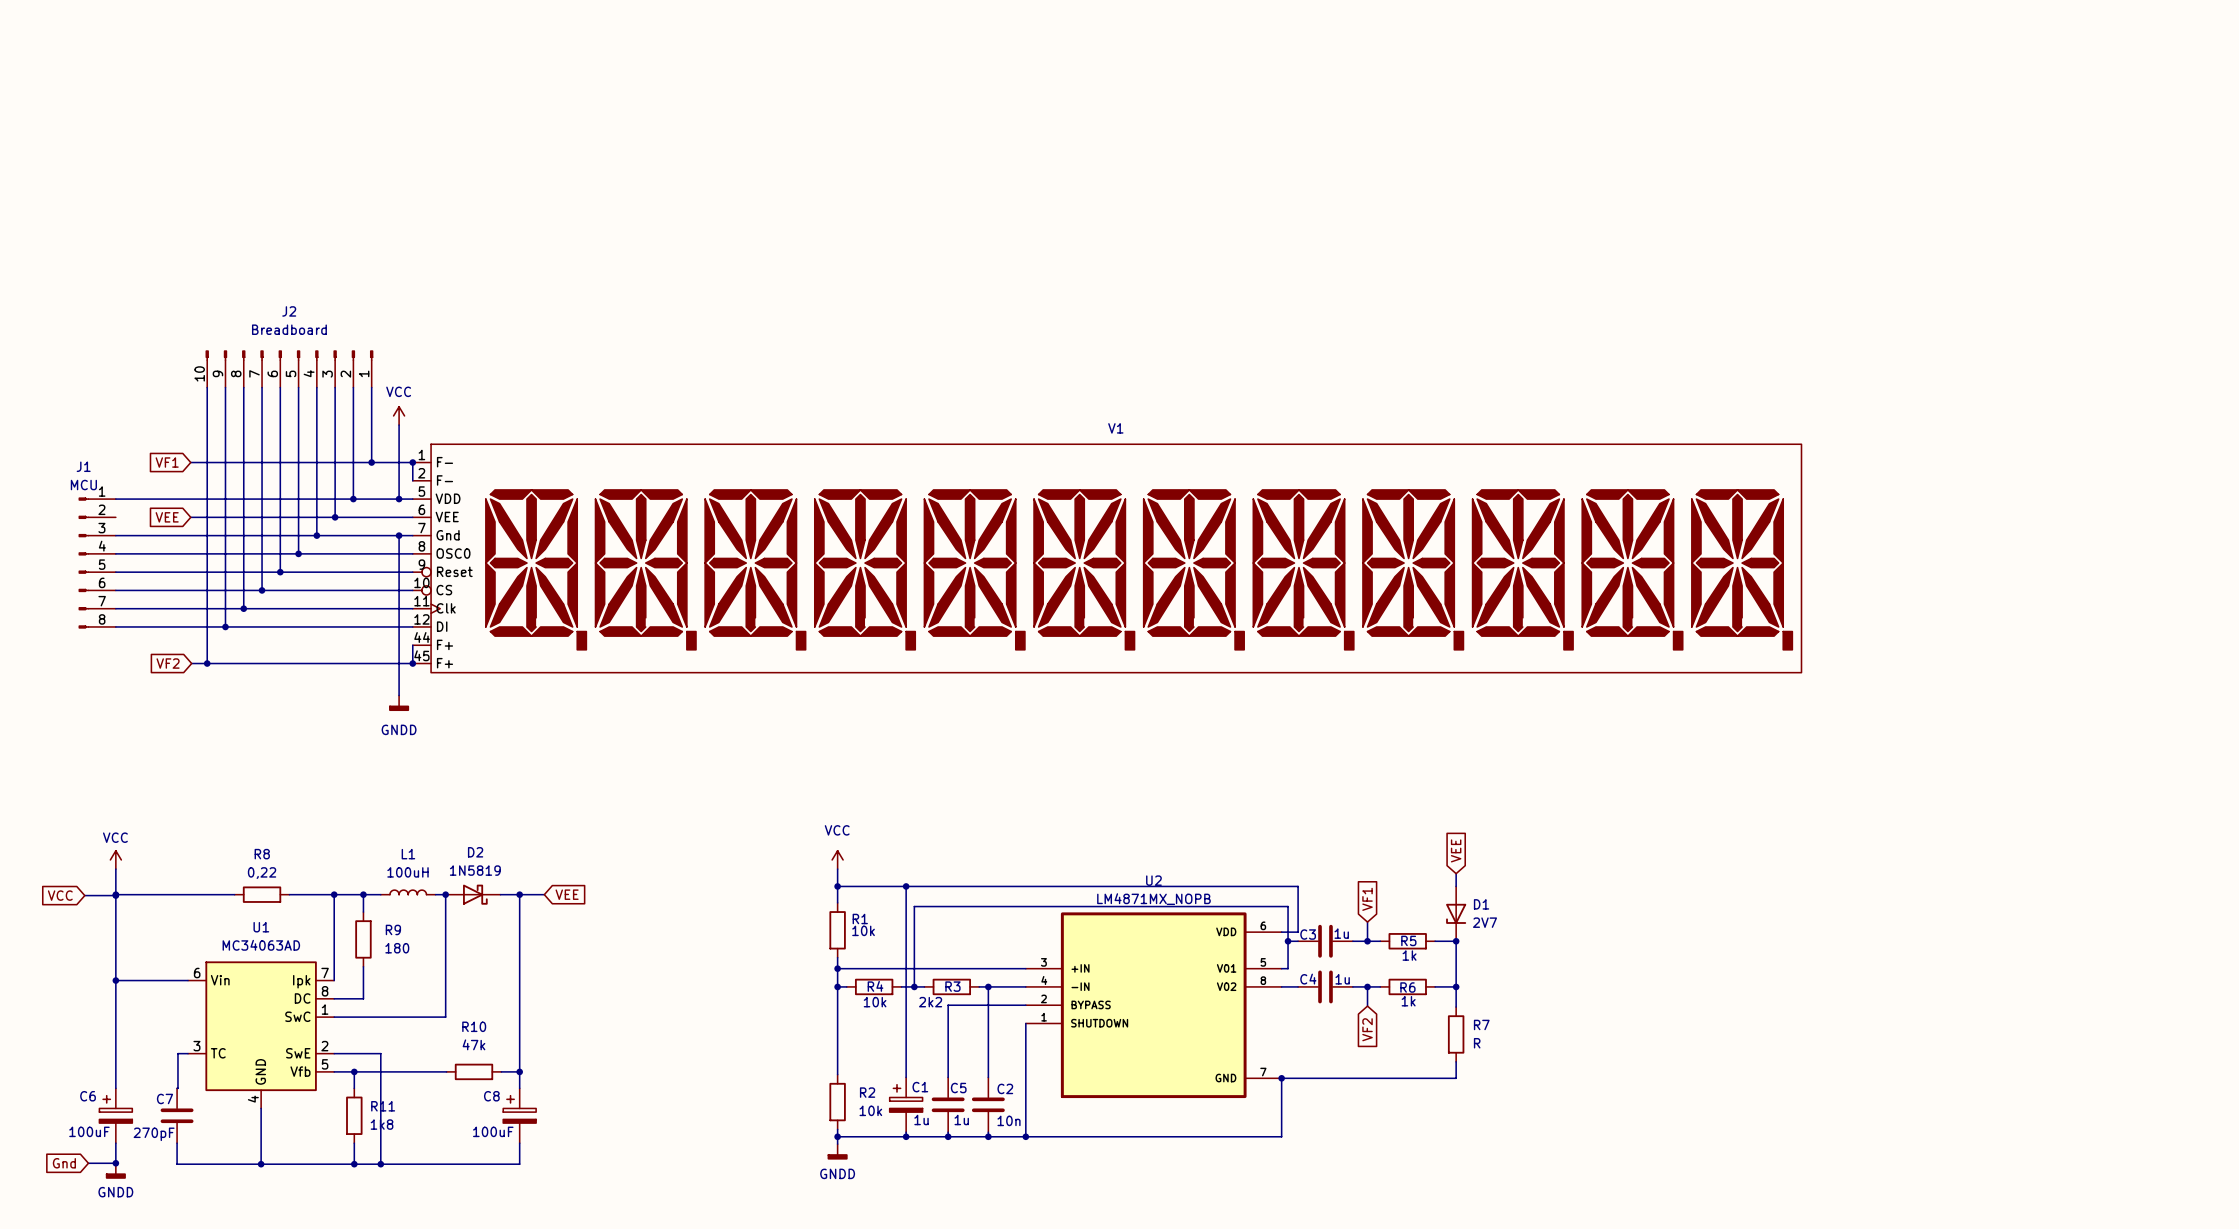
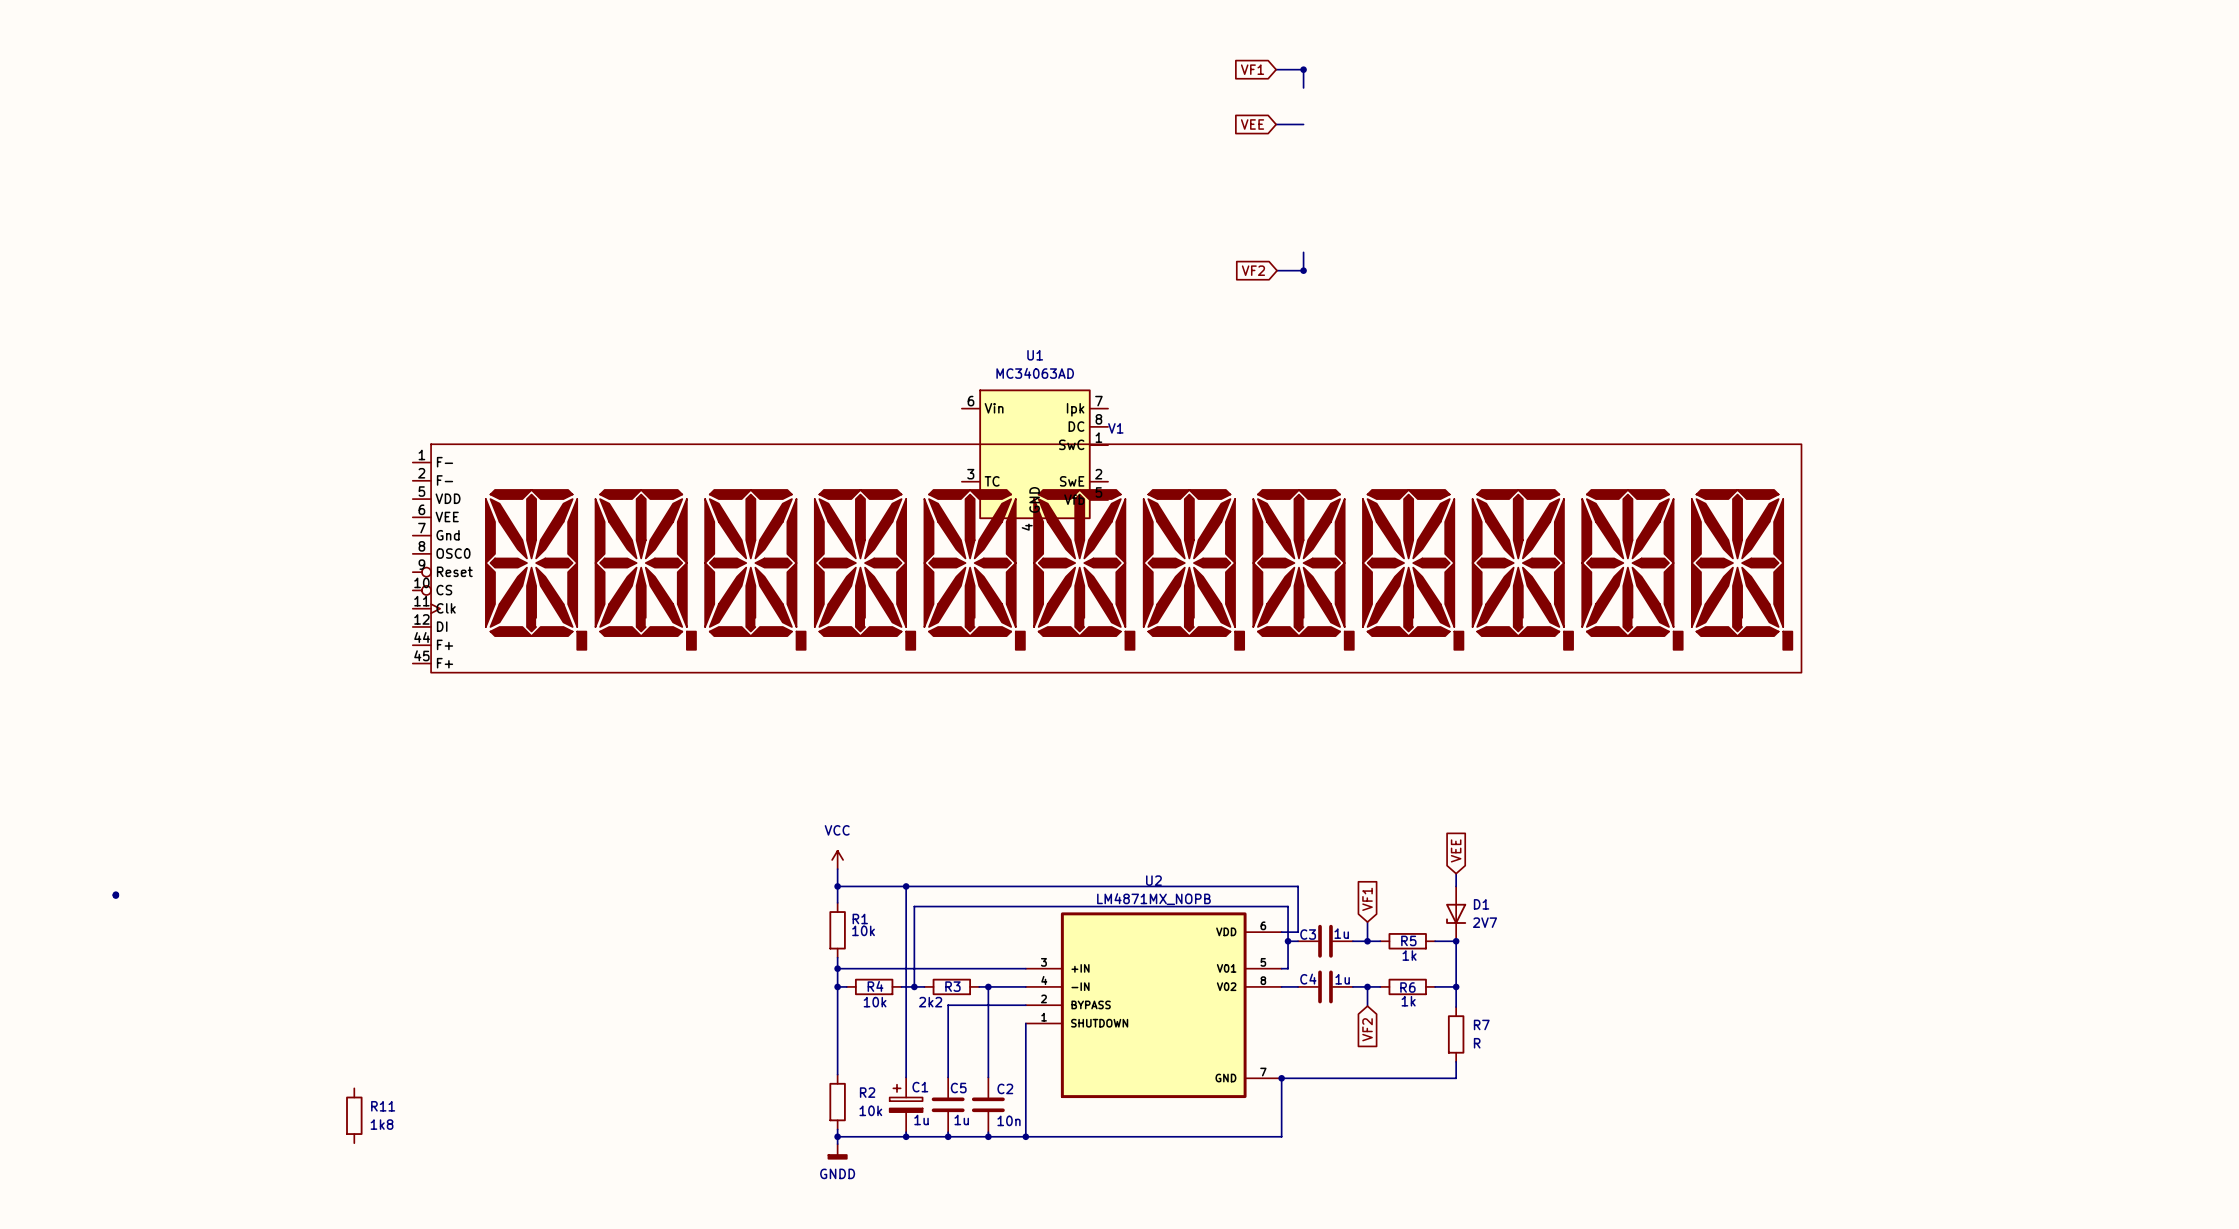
global label: none -> VF1 (1252, 69)
wire: none -> (1276, 69) (1303, 69) (1303, 87)
junction: none -> (1303, 69)
global label: none -> VEE (1252, 124)
wire: none -> (1276, 124) (1303, 124)
wire: none -> (1303, 252) (1303, 270) (1277, 270)
global label: none -> VF2 (1253, 270)
junction: none -> (1303, 270)
J2: Breadboard (289, 369) -> none
wire: (207, 387) (207, 663) -> none
wire: (225, 387) (225, 626) -> none
wire: (243, 387) (243, 608) -> none
wire: (262, 387) (262, 590) -> none
wire: (280, 387) (280, 572) -> none
wire: (298, 387) (298, 553) -> none
wire: (316, 387) (316, 535) -> none
wire: (335, 387) (335, 517) -> none
wire: (353, 387) (353, 499) -> none
wire: (371, 387) (371, 462) -> none
power symbol: VCC (399, 415) -> none
wire: (399, 425) (399, 499) -> none
global label: VF1 (167, 462) -> none
wire: (190, 462) (412, 462) (412, 480) -> none
junction: (371, 462) -> none
junction: (412, 462) -> none
wire: (115, 499) (412, 499) -> none
junction: (353, 499) -> none
junction: (399, 499) -> none
global label: VEE (167, 517) -> none
wire: (190, 517) (412, 517) -> none
junction: (335, 517) -> none
wire: (115, 535) (412, 535) -> none
junction: (316, 535) -> none
wire: (399, 535) (399, 695) -> none
junction: (399, 535) -> none
wire: (115, 553) (412, 553) -> none
junction: (298, 553) -> none
J1: MCU (97, 563) -> none
wire: (115, 572) (412, 572) -> none
junction: (280, 572) -> none
wire: (115, 590) (412, 590) -> none
junction: (262, 590) -> none
wire: (115, 608) (412, 608) -> none
junction: (243, 608) -> none
wire: (115, 626) (412, 626) -> none
junction: (225, 626) -> none
wire: (412, 645) (412, 663) (191, 663) -> none
global label: VF2 (168, 663) -> none
junction: (207, 663) -> none
junction: (412, 663) -> none
power symbol: GNDD (399, 703) -> none
power symbol: VCC (115, 859) -> none
wire: (115, 869) (115, 1088) -> none
L1: 100uH (408, 892) -> none
wire: (115, 894) (234, 894) -> none
R8: 0,22 (262, 894) -> none
wire: (289, 894) (380, 894) -> none
wire: (334, 894) (334, 980) -> none
junction: (334, 894) -> none
wire: (363, 894) (363, 912) -> none
junction: (363, 894) -> none
wire: (435, 894) (445, 894) (445, 1017) (334, 1017) -> none
junction: (445, 894) -> none
D2: 1N5819 (473, 894) -> none
wire: (500, 894) (544, 894) -> none
wire: (519, 894) (519, 1088) -> none
junction: (519, 894) -> none
global label: VEE (567, 894) -> none
global label: VCC (60, 895) -> none
wire: (84, 895) (115, 895) -> none
R9: 180 (363, 939) -> none
wire: (363, 966) (363, 998) (334, 998) -> none
wire: (115, 980) (188, 980) -> none
junction: (115, 980) -> none
U1 position: (261, 1034) -> (1034, 462)
wire: (188, 1053) (177, 1053) (177, 1088) -> none
wire: (334, 1053) (380, 1053) (380, 1164) -> none
wire: (334, 1071) (446, 1071) -> none
wire: (354, 1071) (354, 1088) -> none
junction: (354, 1071) -> none
R10: 47k (473, 1071) -> none
wire: (501, 1071) (519, 1071) -> none
junction: (519, 1071) -> none
wire: (261, 1108) (261, 1164) -> none
C6: 100uF (115, 1115) -> none
C7: 270pF (177, 1115) -> none
C8: 100uF (519, 1115) -> none
wire: (115, 1143) (115, 1163) (88, 1163) -> none
wire: (177, 1143) (177, 1164) (519, 1164) (519, 1143) -> none
wire: (354, 1143) (354, 1164) -> none
global label: Gnd (64, 1163) -> none
junction: (115, 1163) -> none
junction: (261, 1164) -> none
junction: (354, 1164) -> none
junction: (380, 1164) -> none
power symbol: GNDD (115, 1171) -> none

